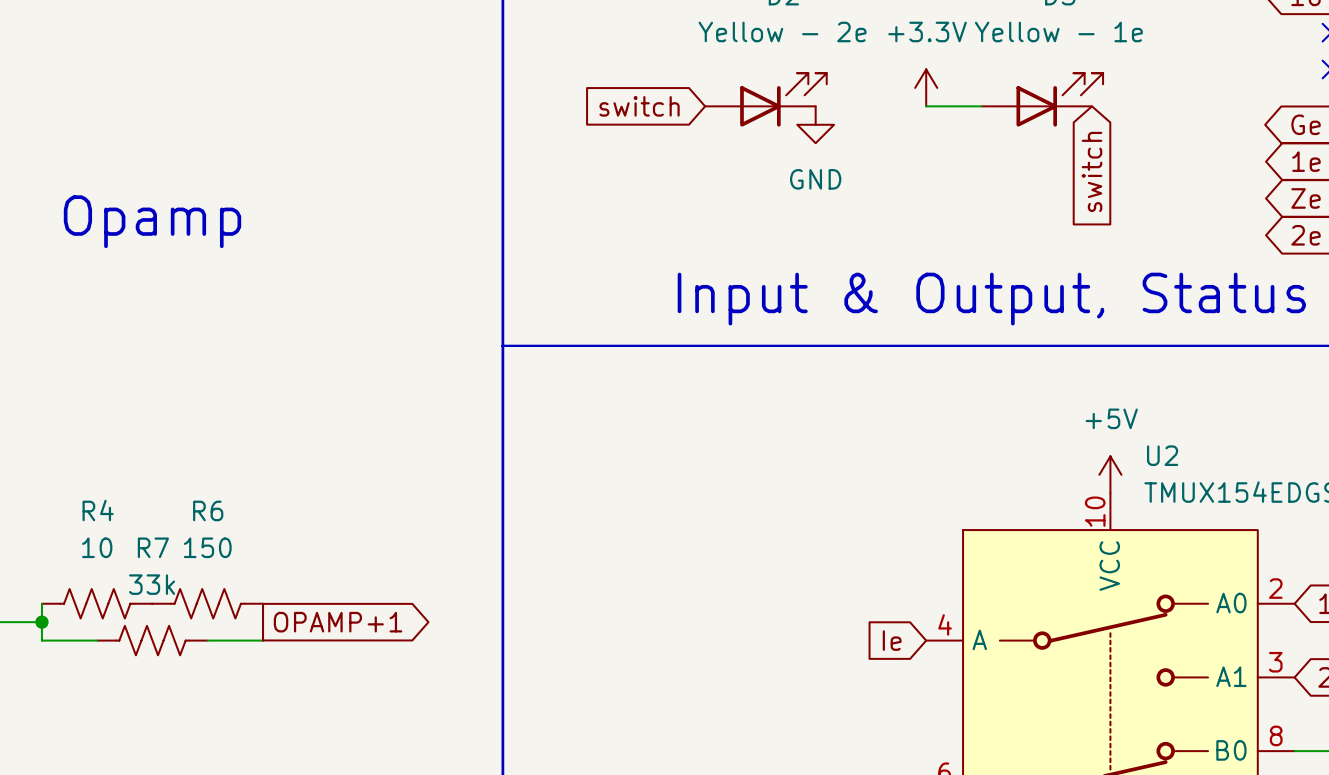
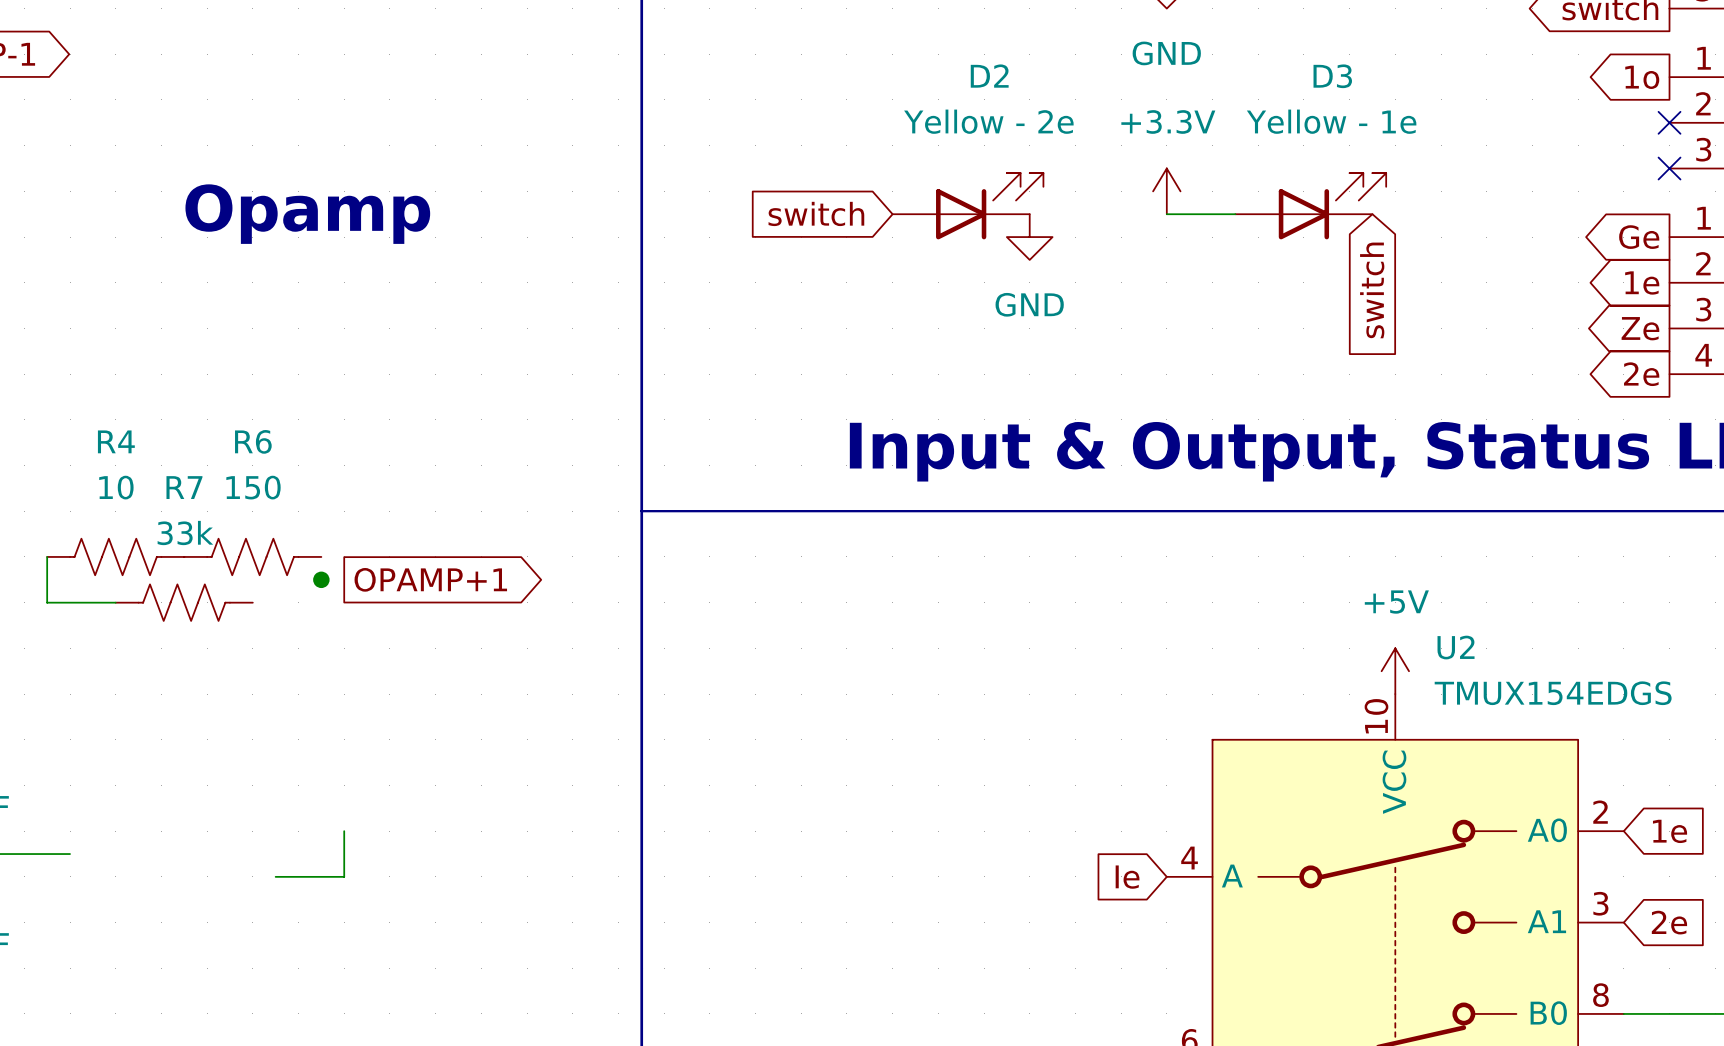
text position: Opamp (152, 221) -> Opamp (307, 214)
junction: none -> (321, 579)
wire: (41, 603) (41, 640) (97, 640) -> (47, 556) (47, 602) (115, 602)
R4 position: (97, 603) -> (115, 556)
R6 position: (207, 603) -> (252, 556)
junction: (41, 622) -> none
global label position: OPAMP+1 (338, 622) -> OPAMP+1 (430, 579)
R7 position: (152, 640) -> (184, 602)

